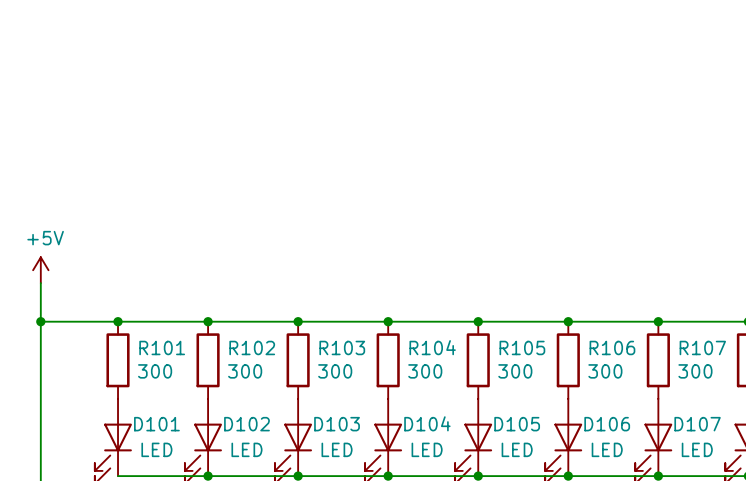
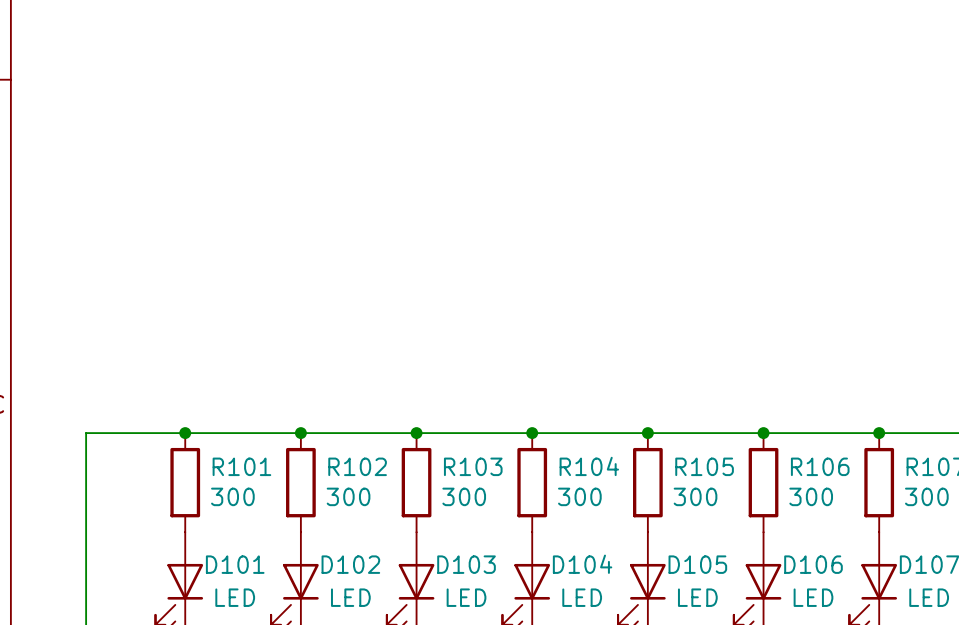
power symbol: +5V (40, 270) -> none
wire: (40, 283) (40, 321) -> none
junction: (40, 321) -> none

